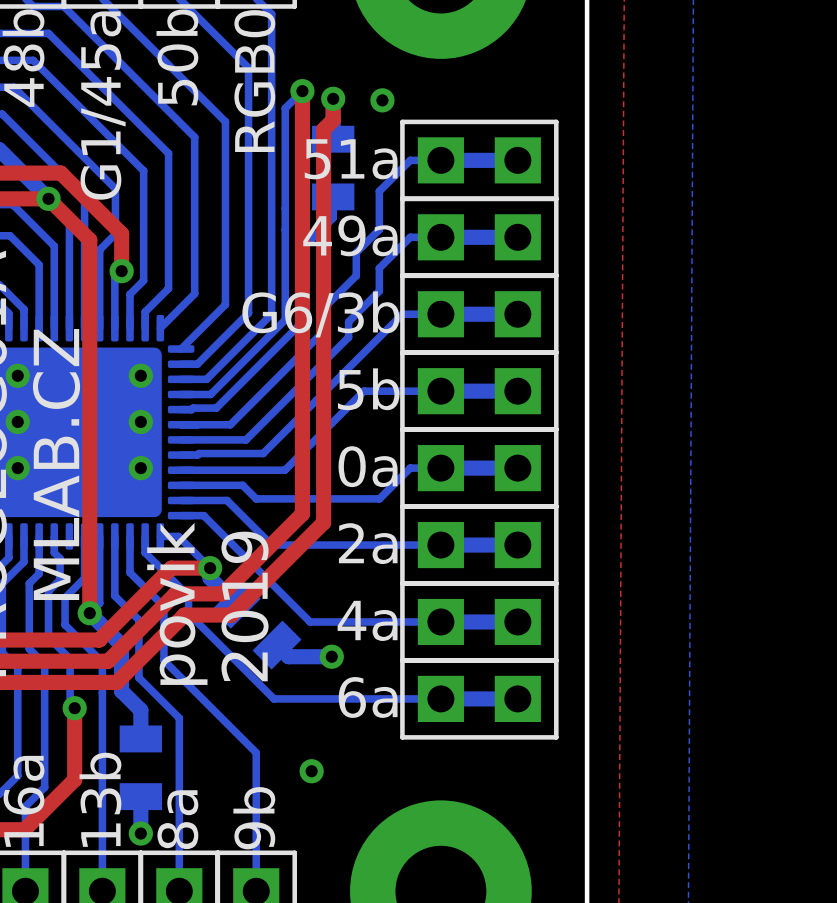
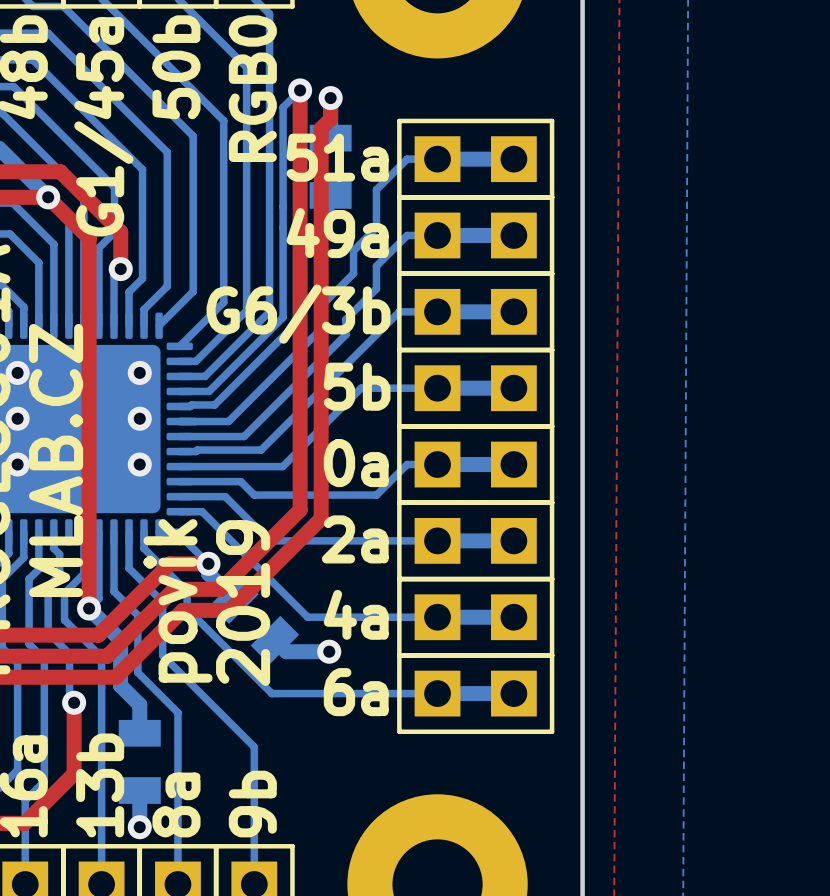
via: (382, 100) -> none
via: (311, 771) -> none

